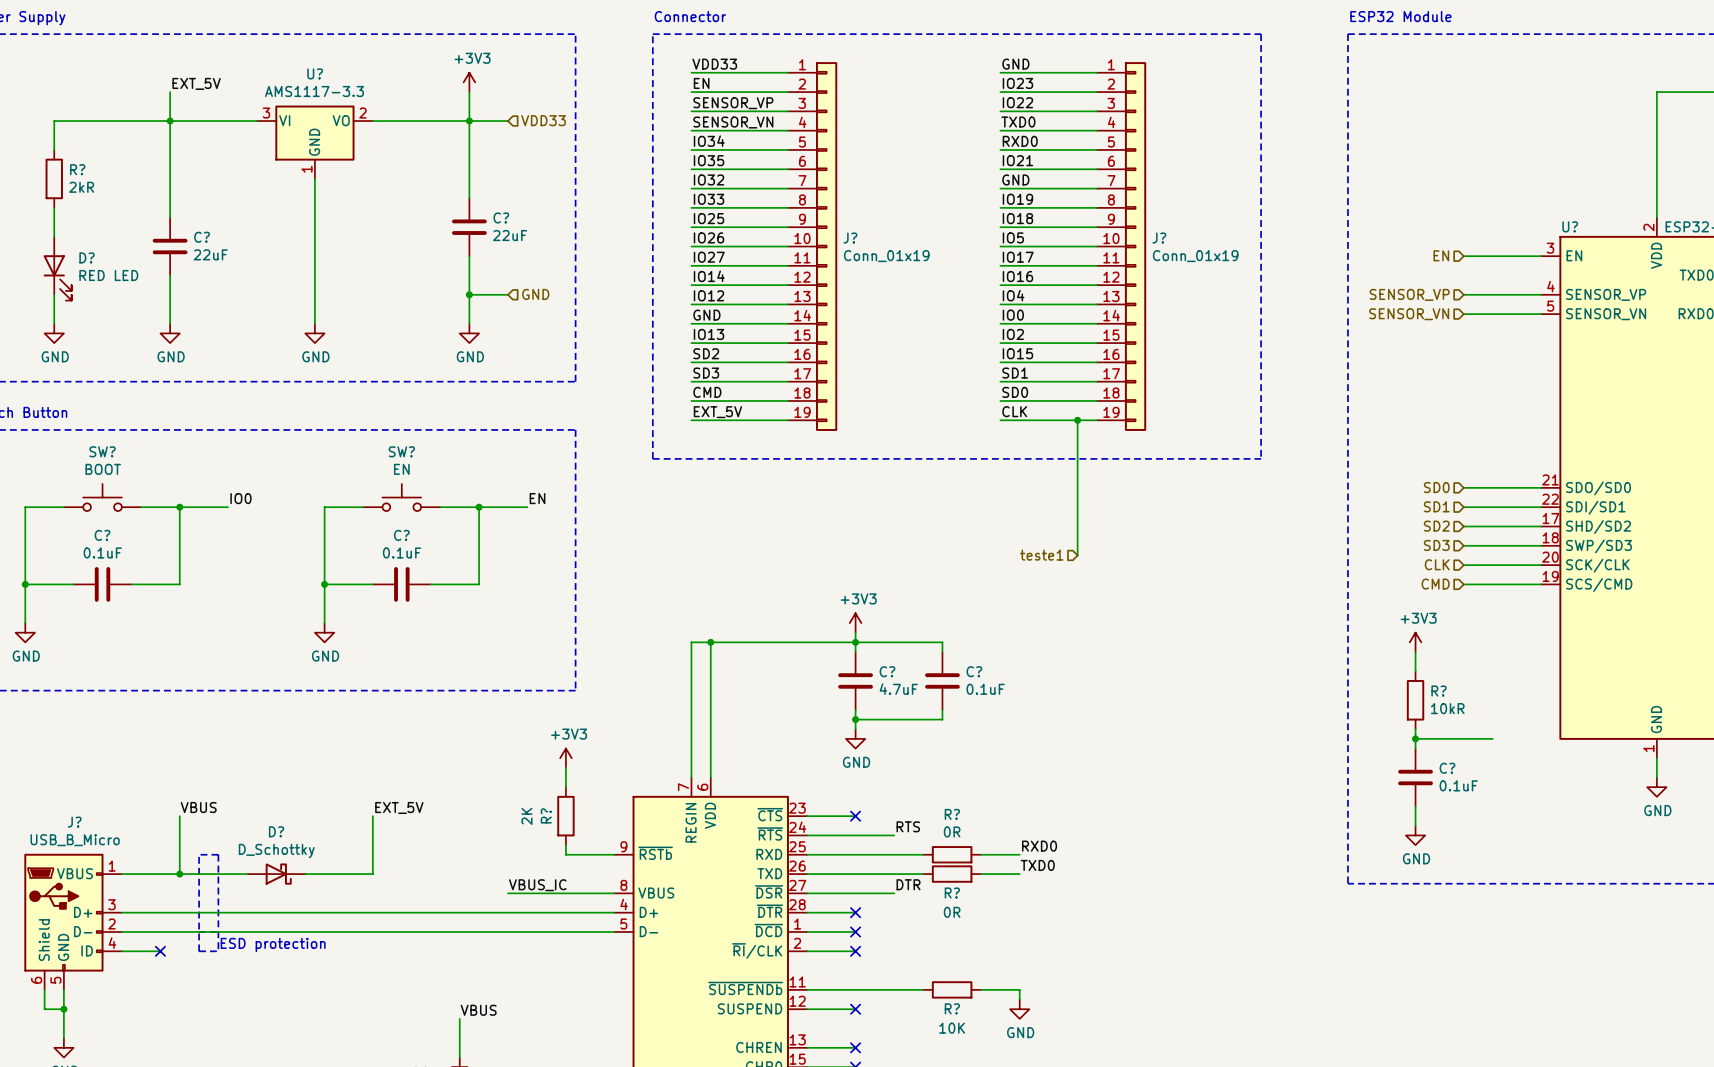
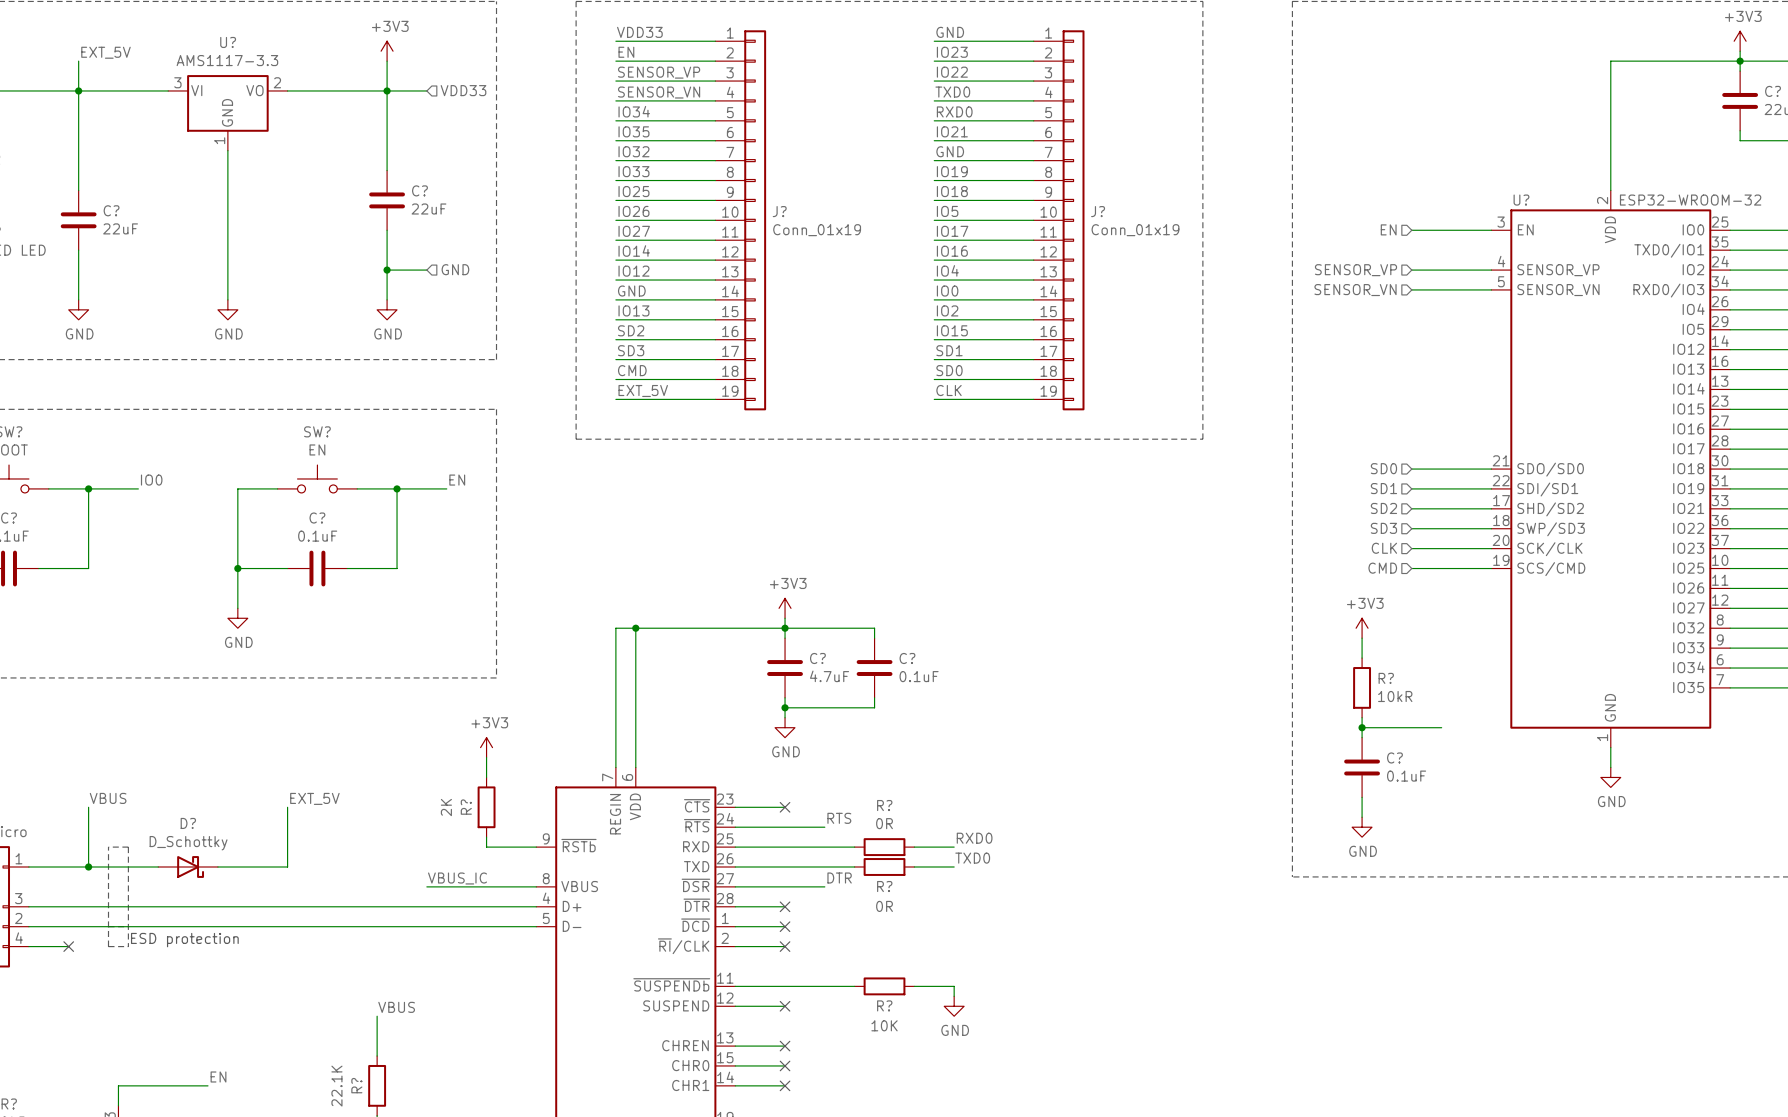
wire: (1077, 420) (1077, 555) -> none
junction: (1077, 420) -> none
hierarchical label: teste1 (1041, 555) -> none

